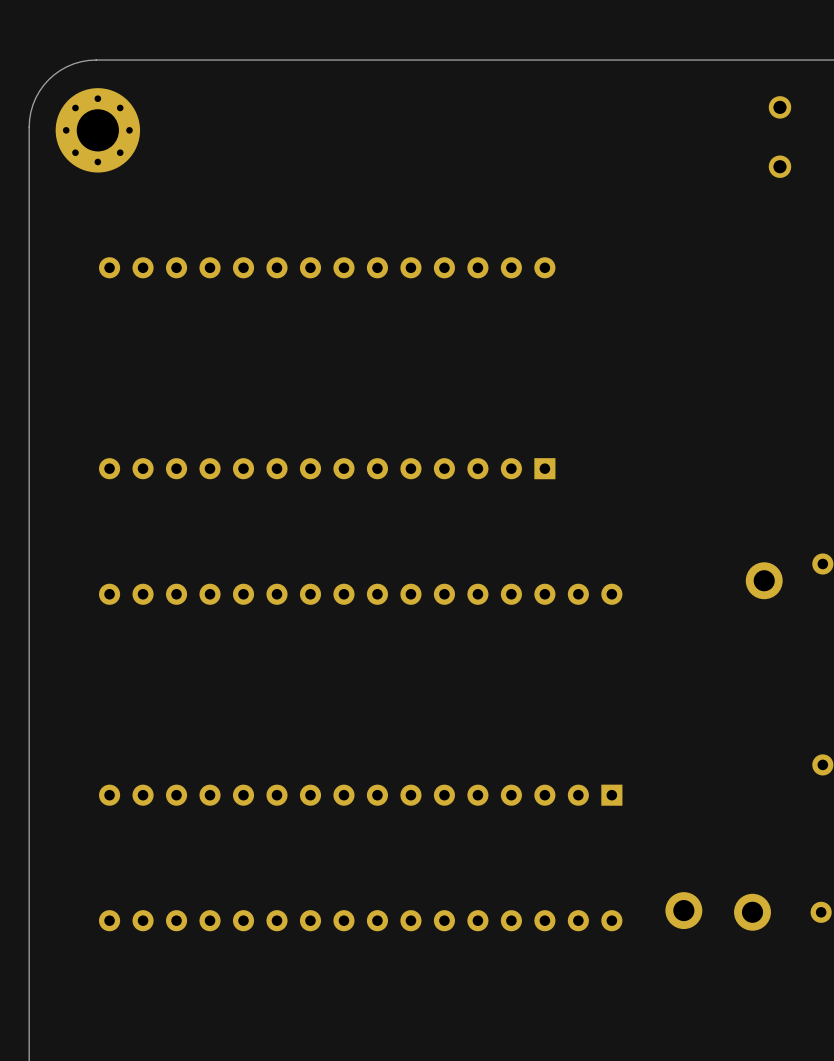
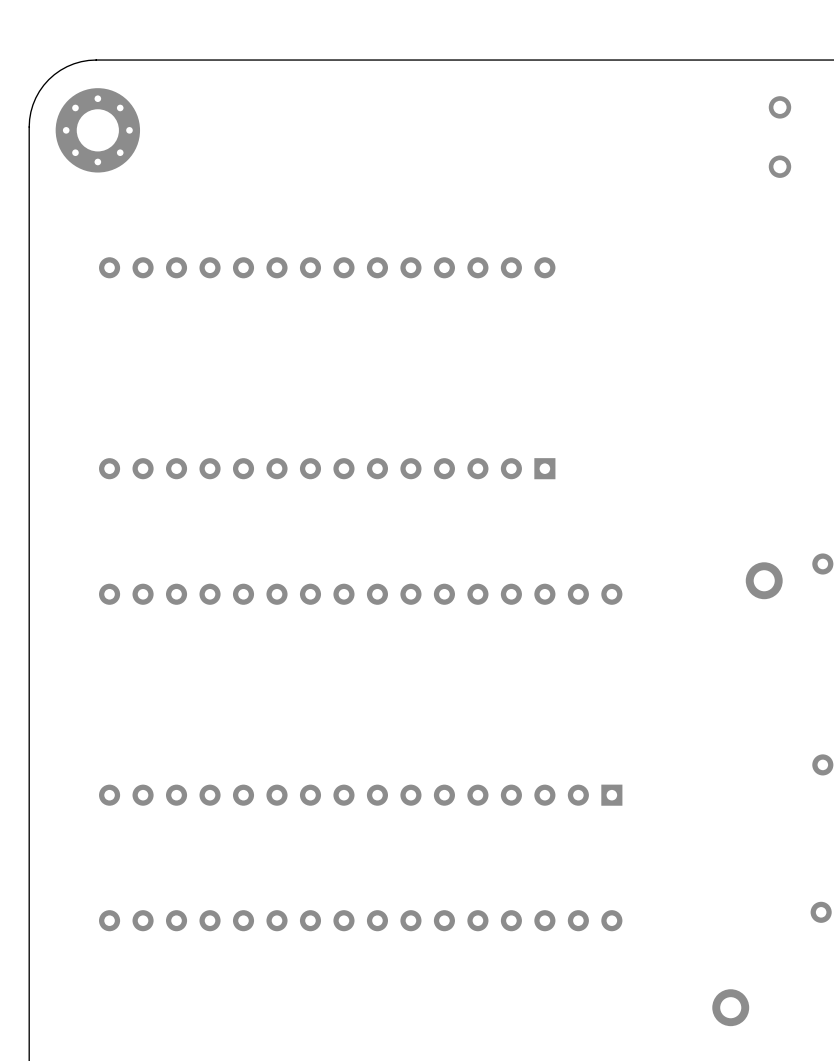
part: (683, 910) -> none
part: (752, 912) -> none
part: none -> (730, 1007)

